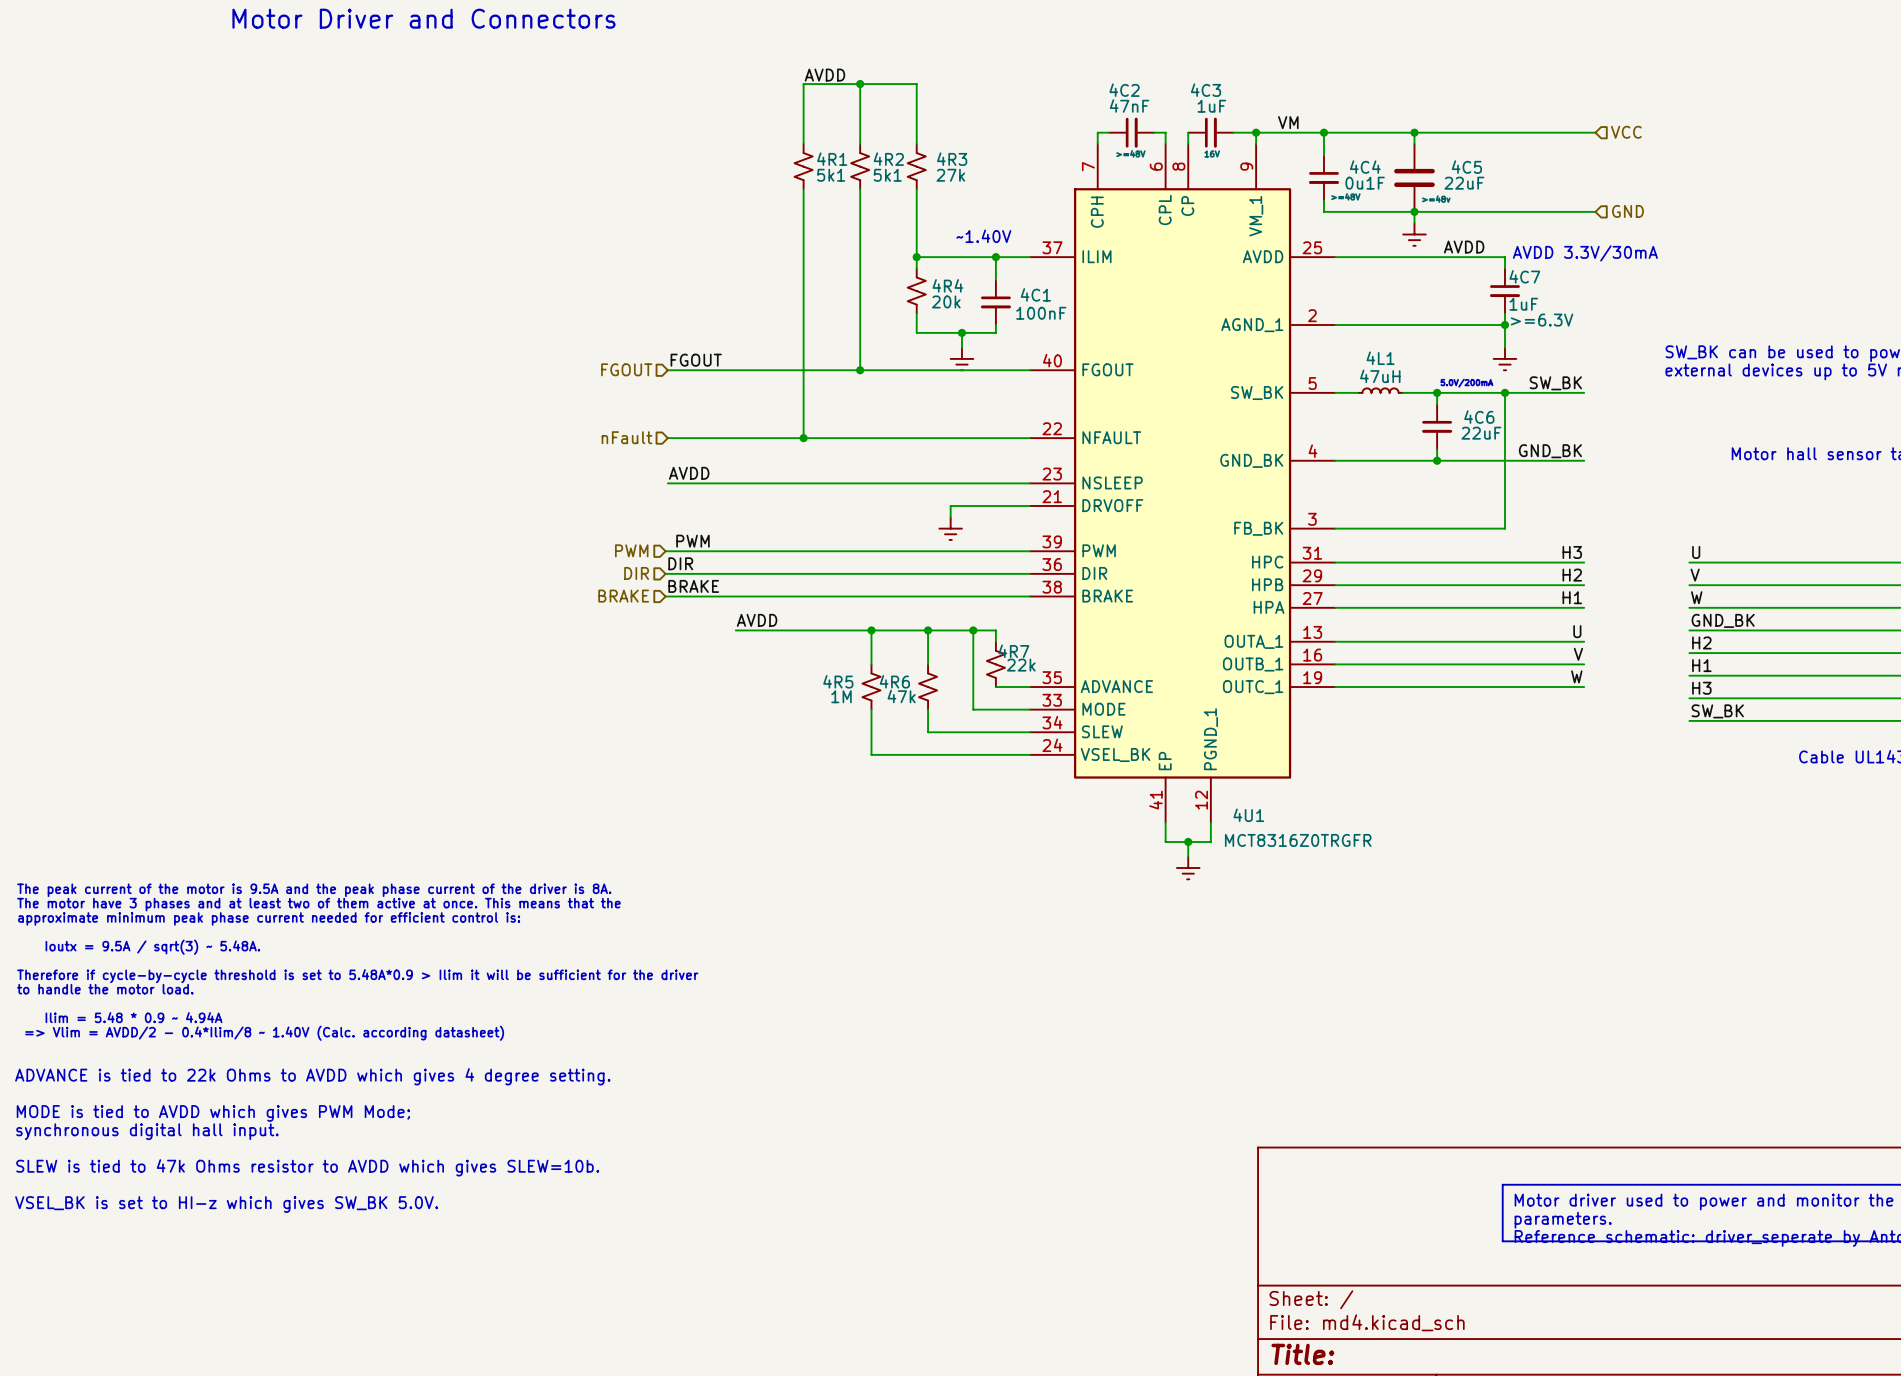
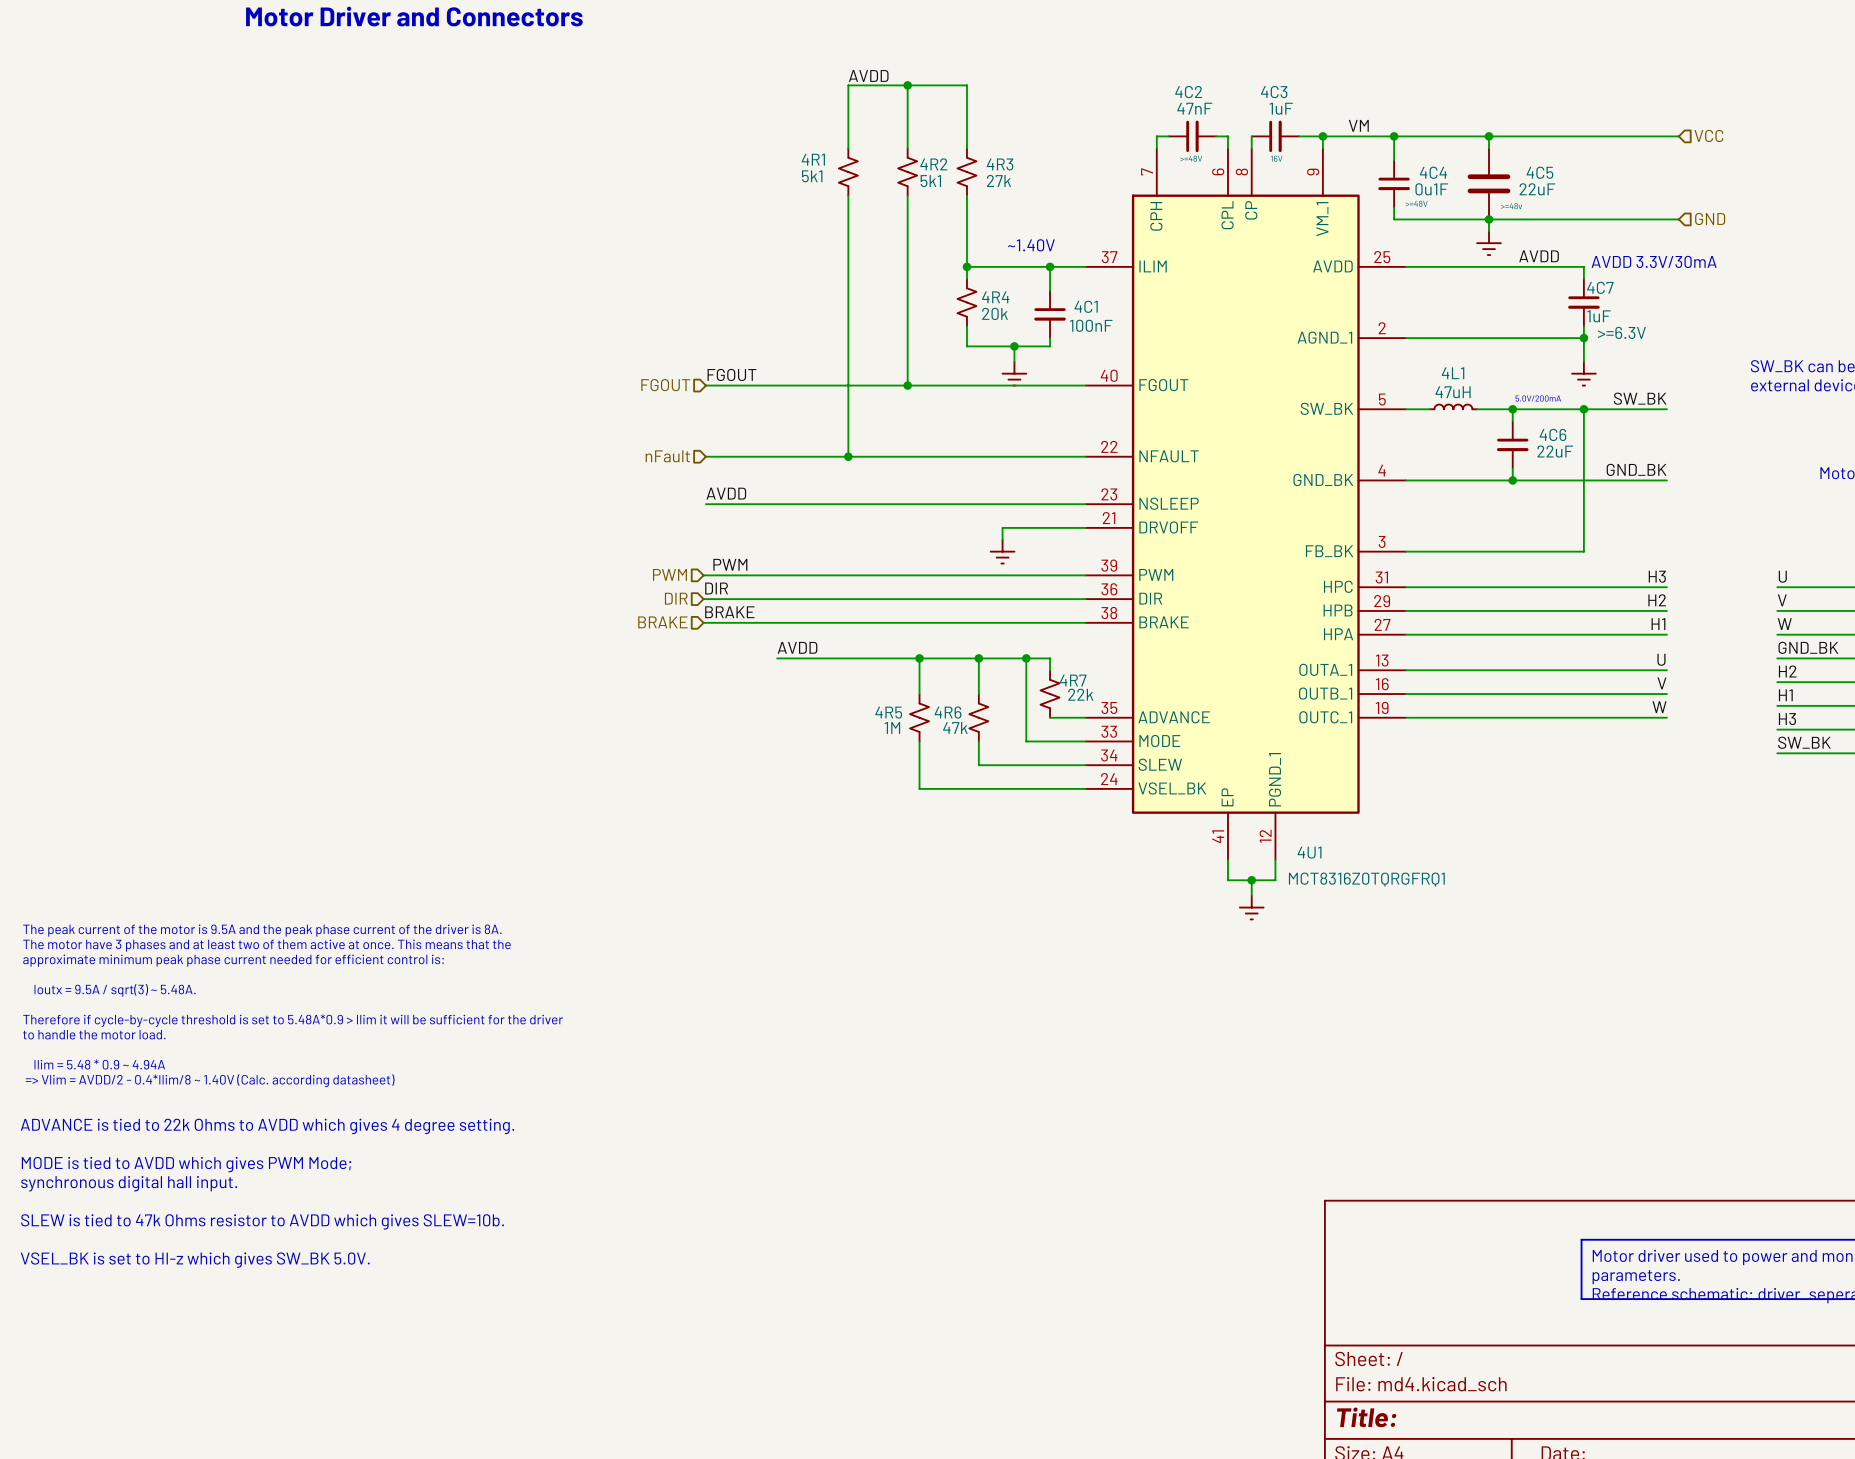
4R1 name position: 4R1 (832, 159) -> 4R1 (813, 159)
4R1 value position: 5k1 (831, 175) -> 5k1 (812, 176)
4U1 value: MCT8316Z0TRGFR (1298, 840) -> MCT8316Z0TQRGFRQ1 (1366, 879)

